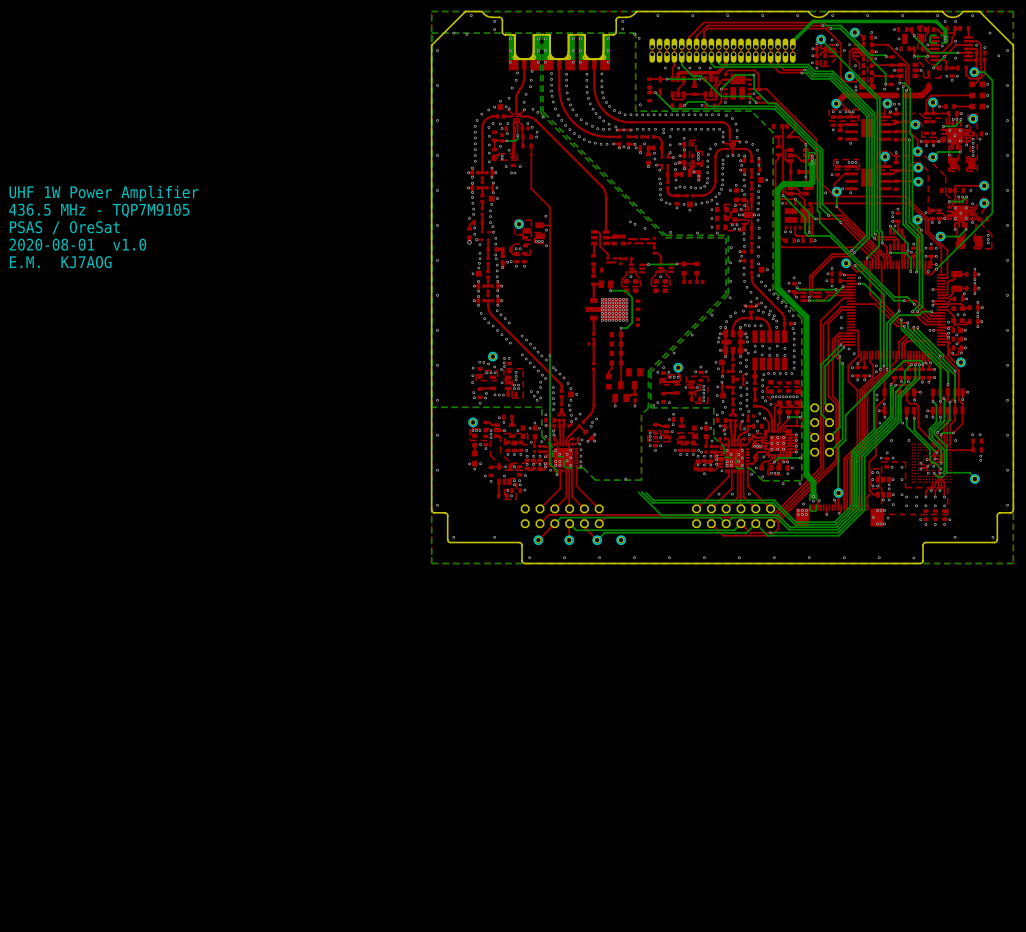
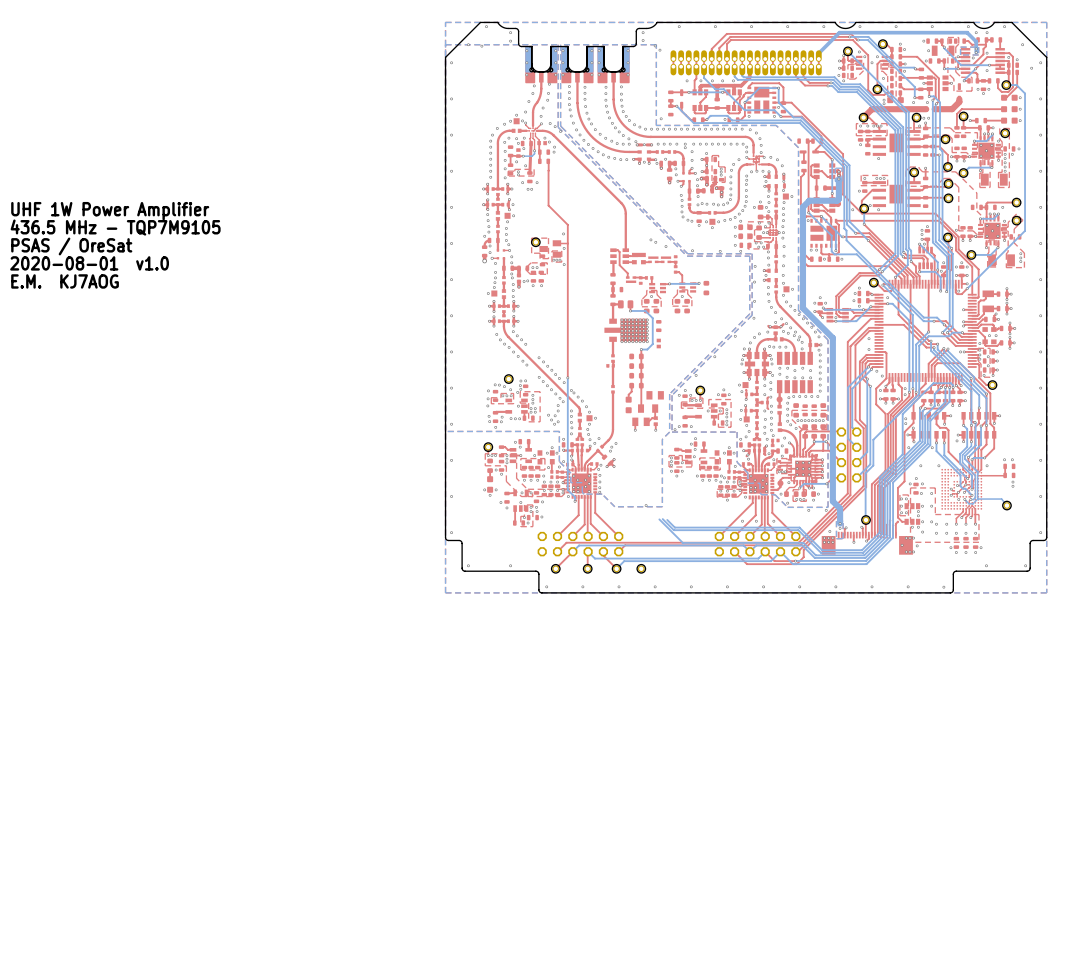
top track: (696, 263) (677, 263) -> none
part: (696, 268) -> none
top track: (684, 273) (684, 281) -> none
top track: (696, 273) (696, 281) -> none
part: (686, 281) -> none
part: (699, 281) -> none

